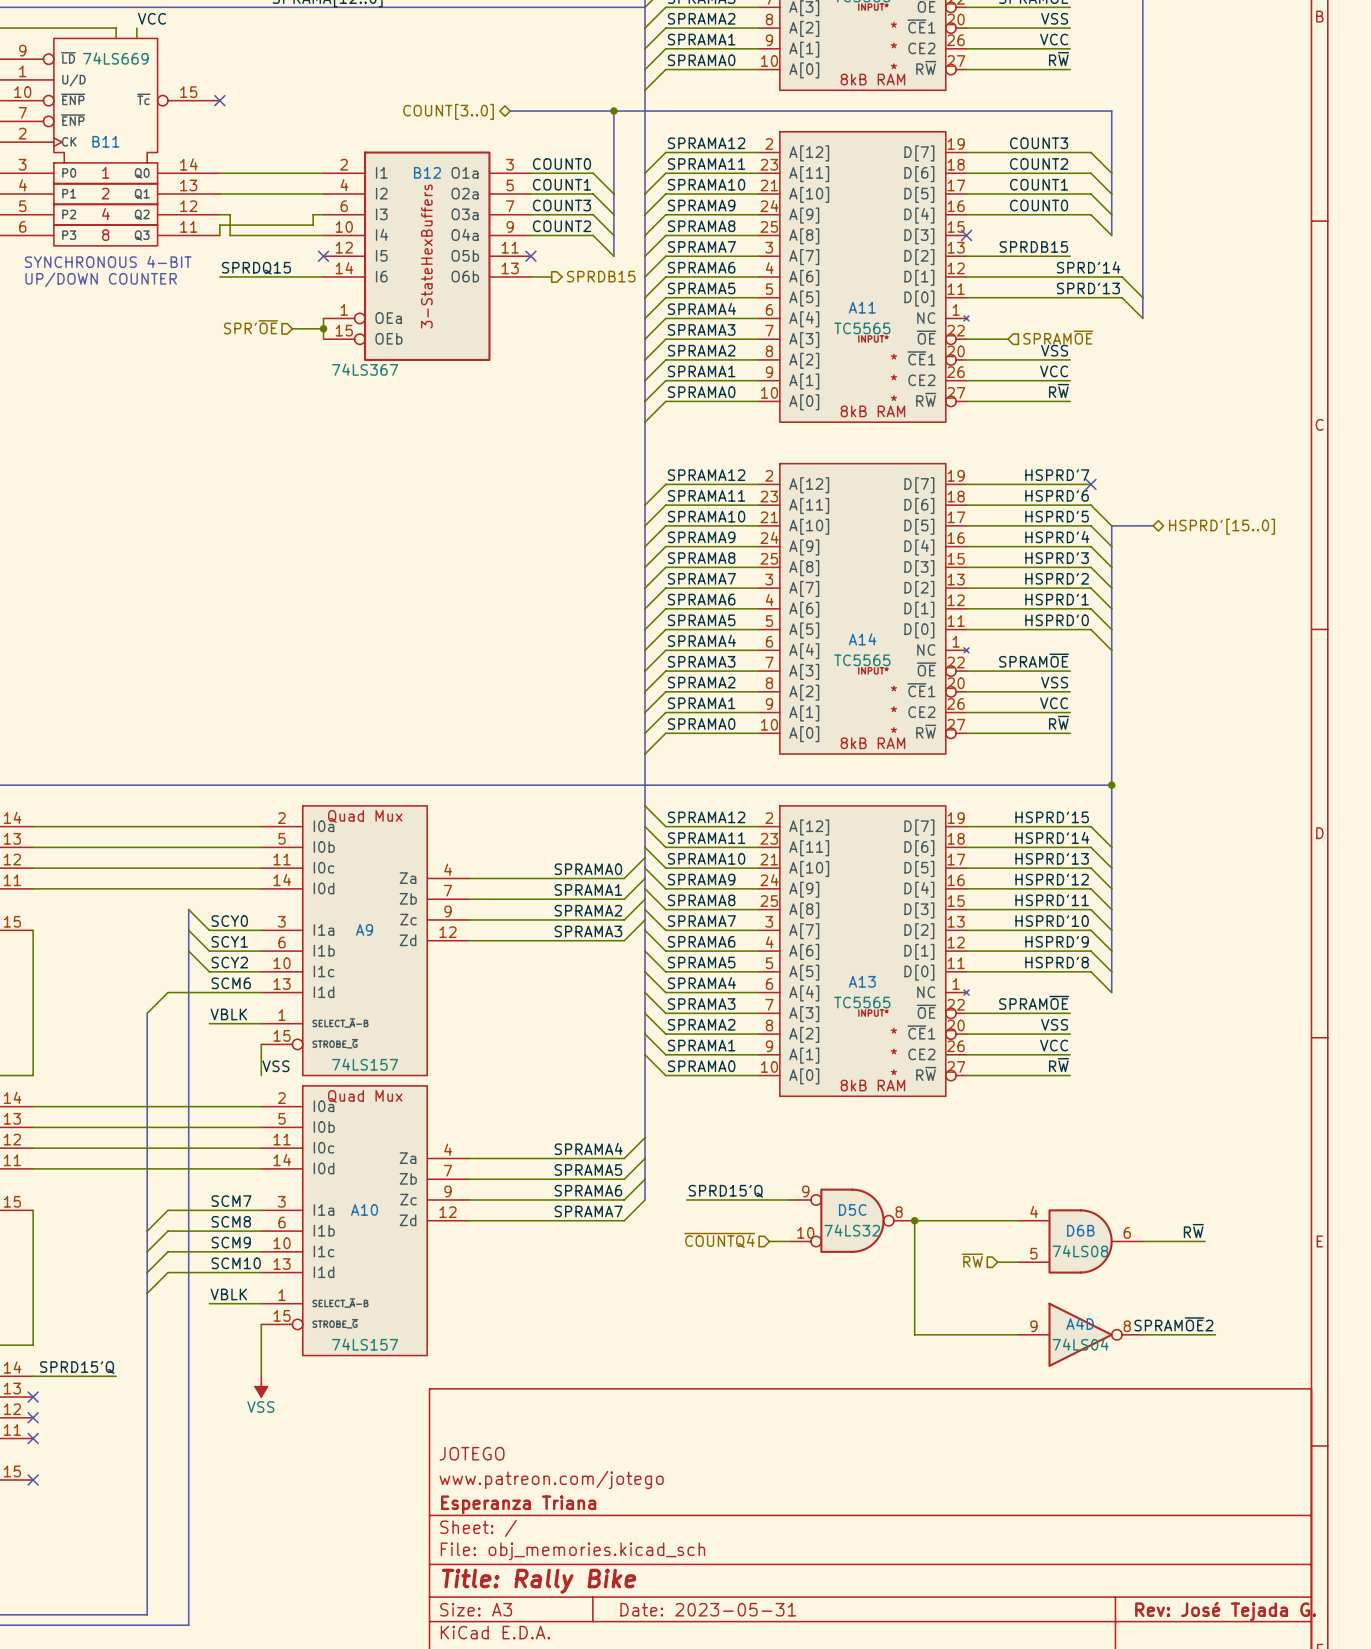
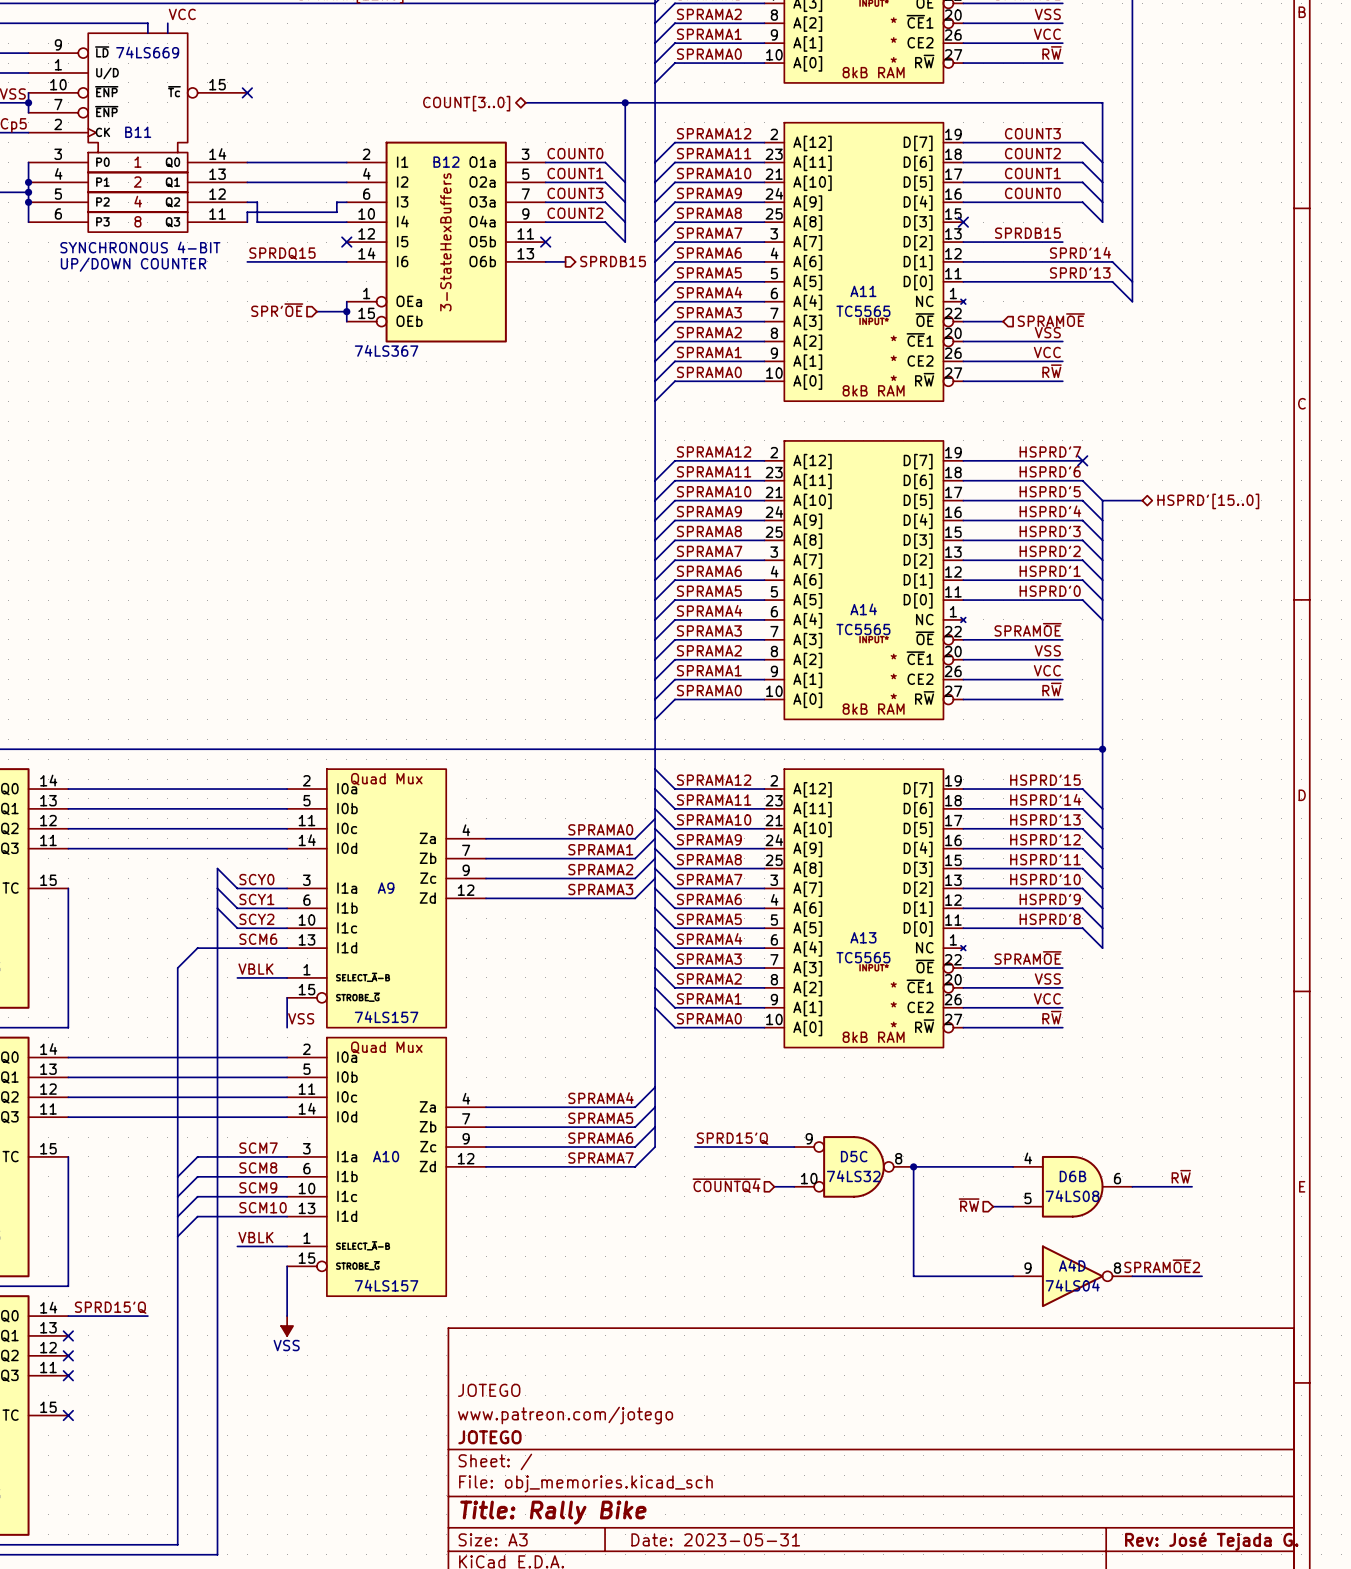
title block: Esperanza Triana (518, 1504) -> JOTEGO (489, 1437)

